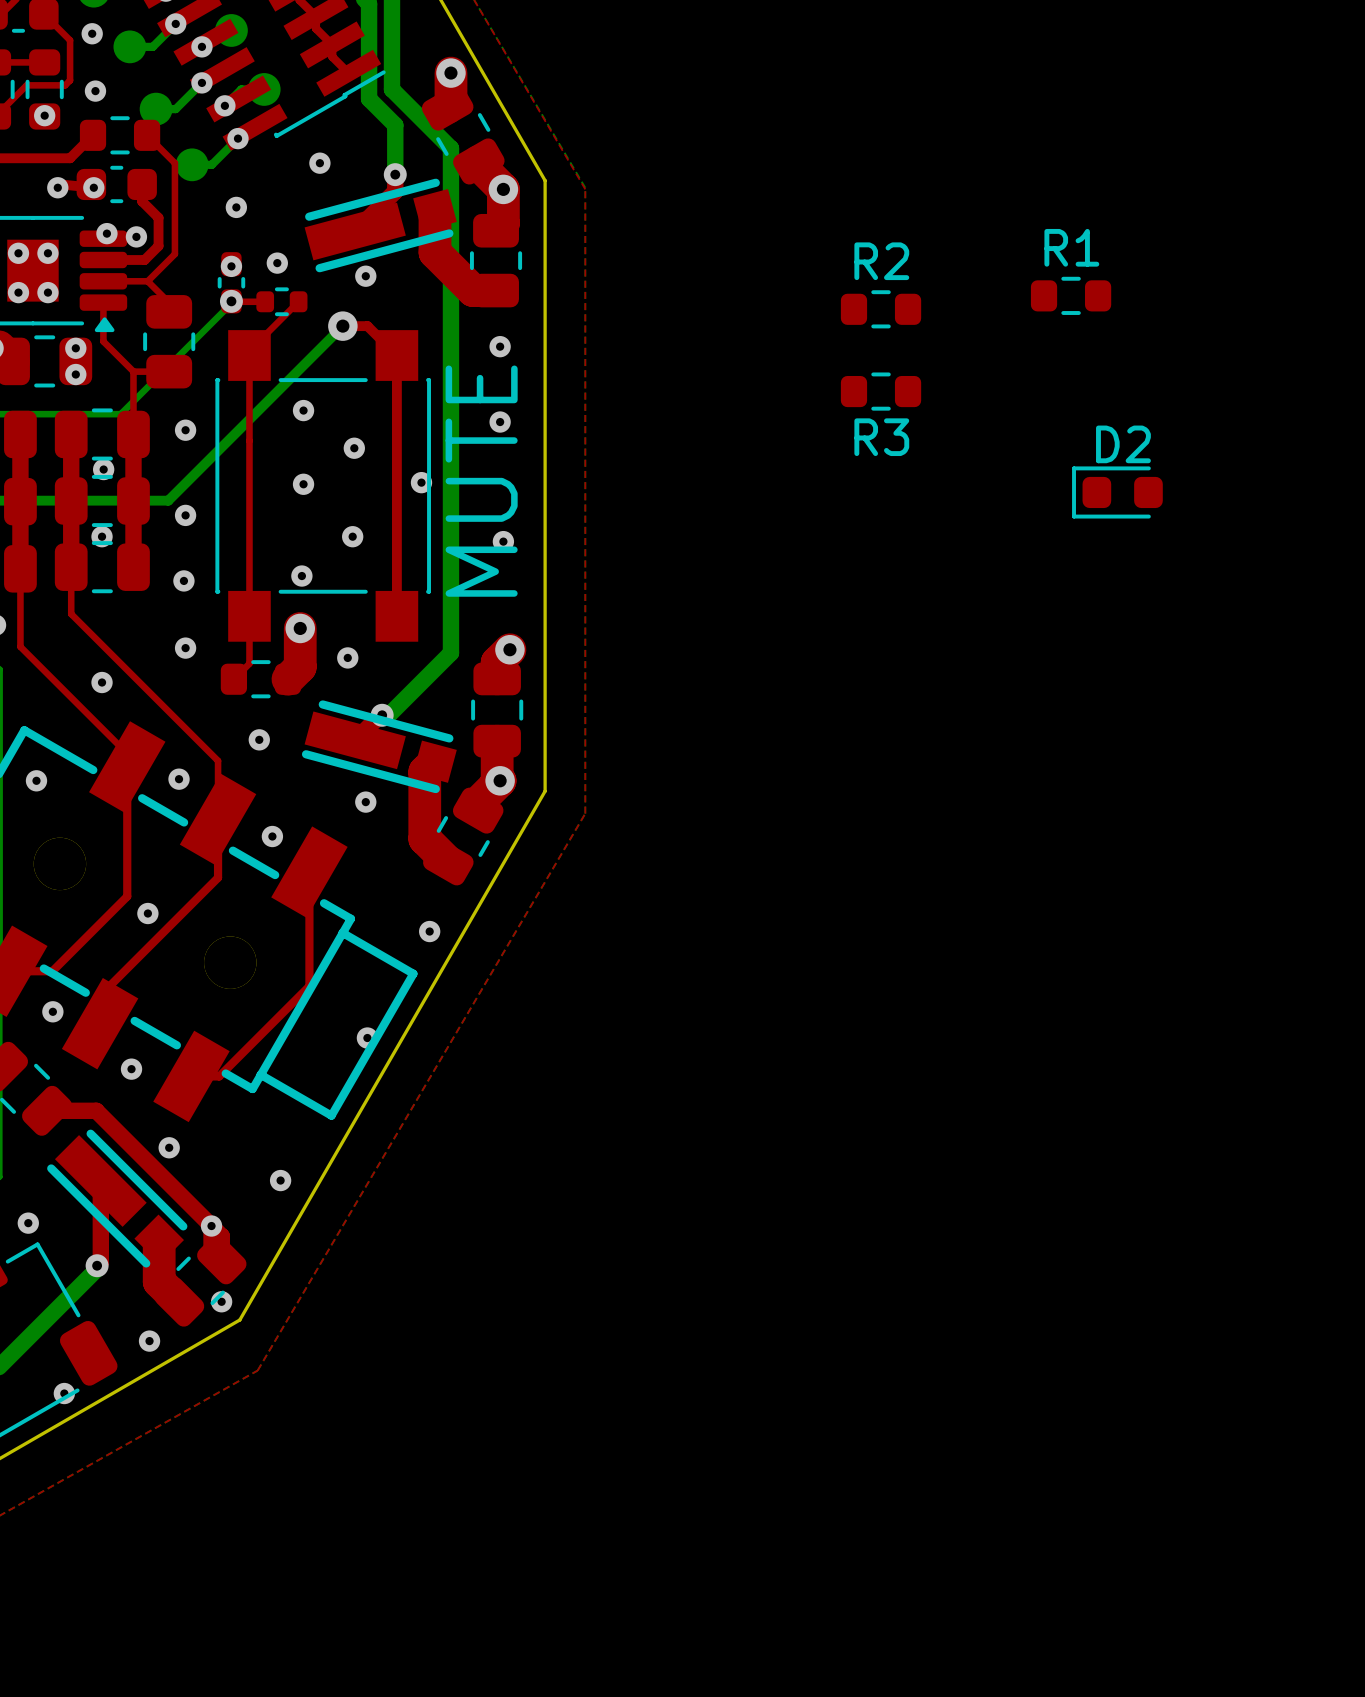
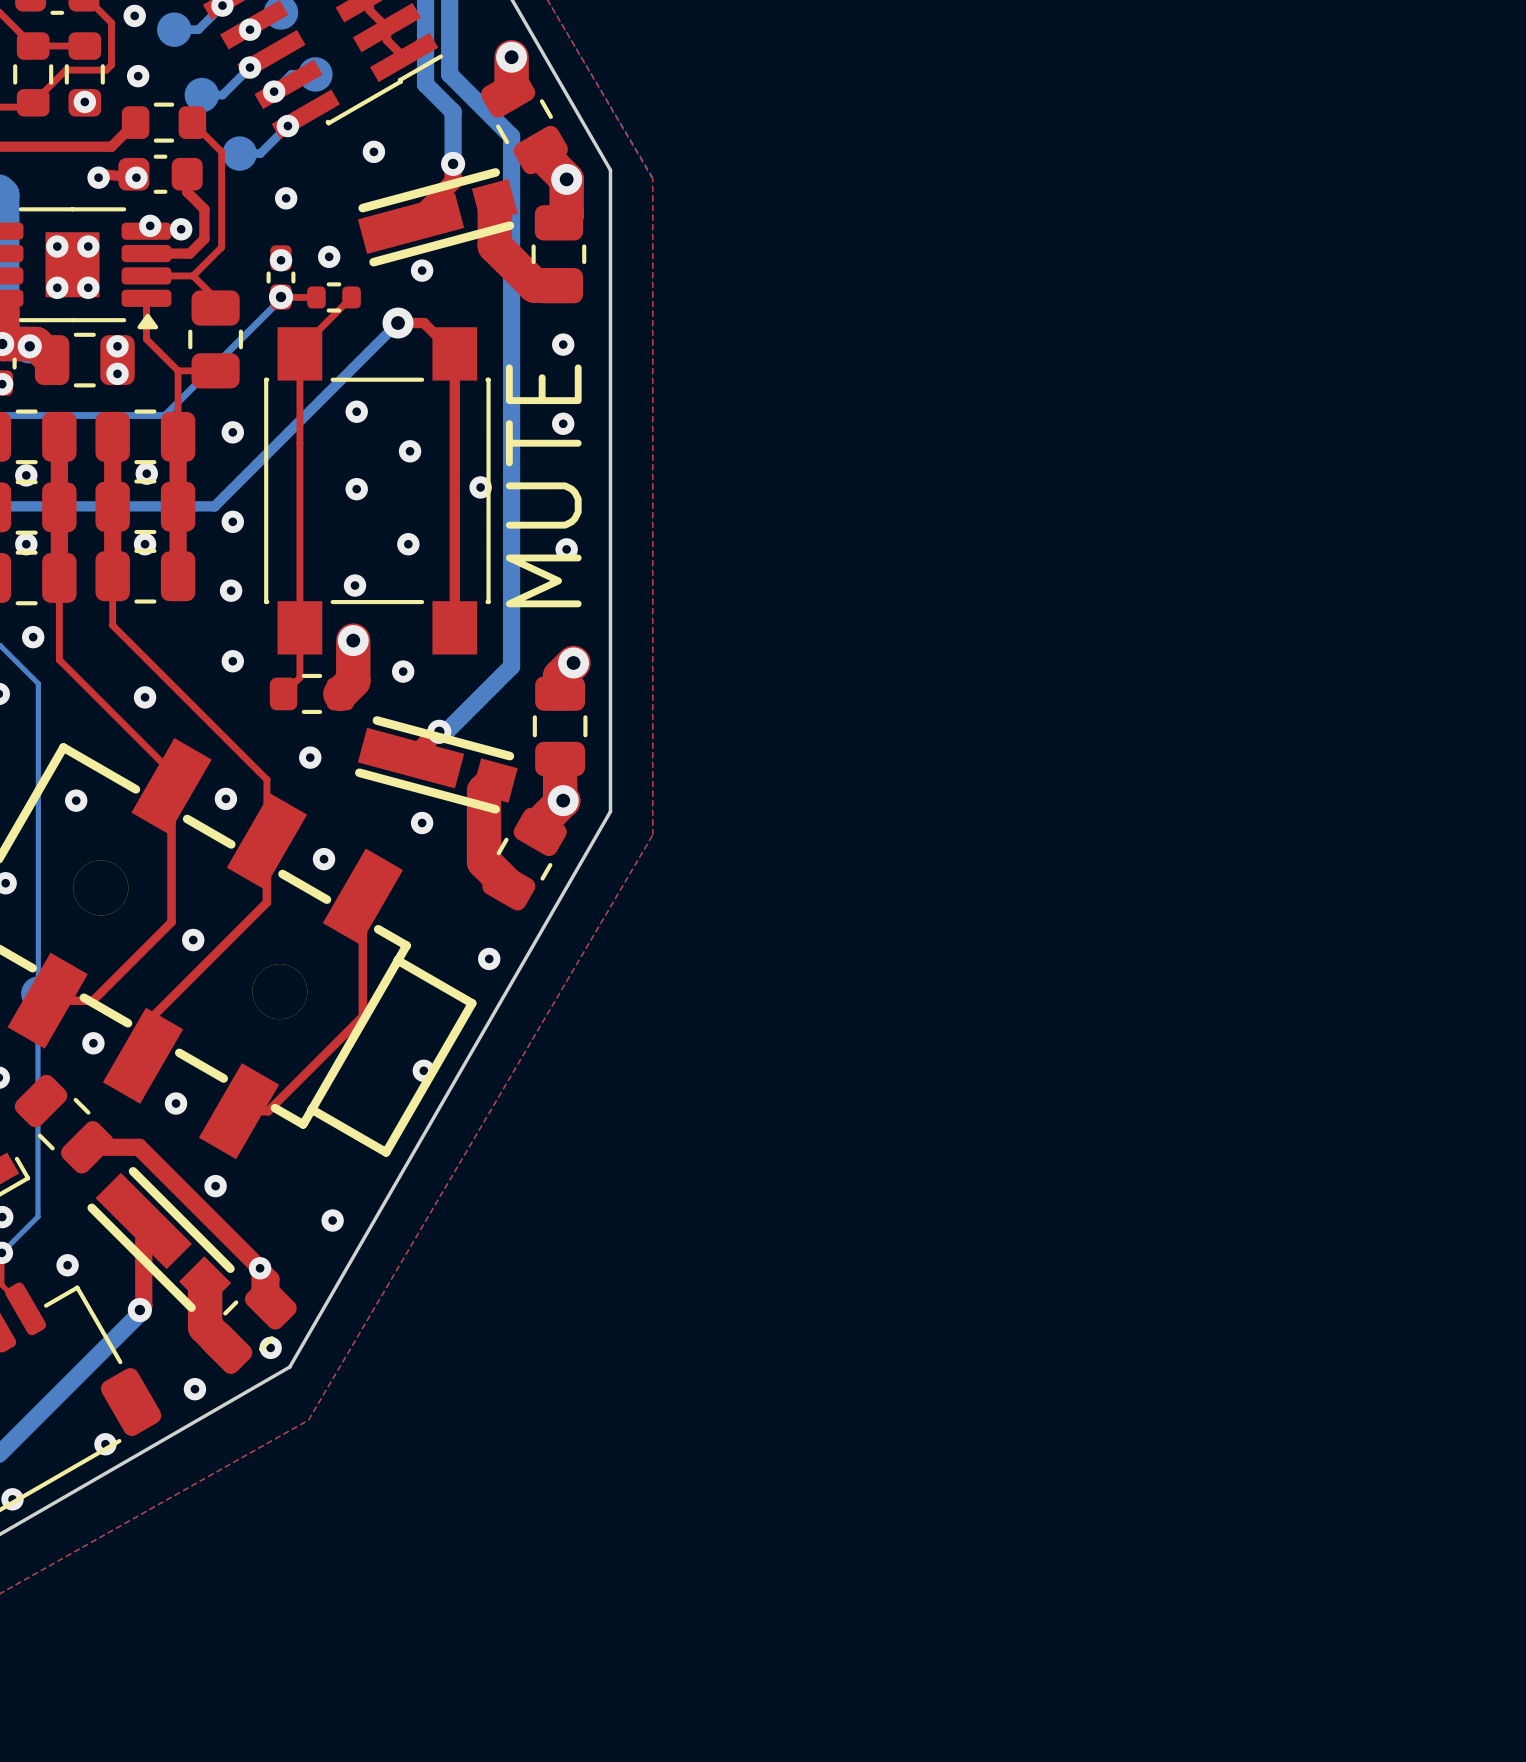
R1: (1071, 295) -> none
R2: (881, 309) -> none
R3: (881, 391) -> none
D2: (1117, 492) -> none

